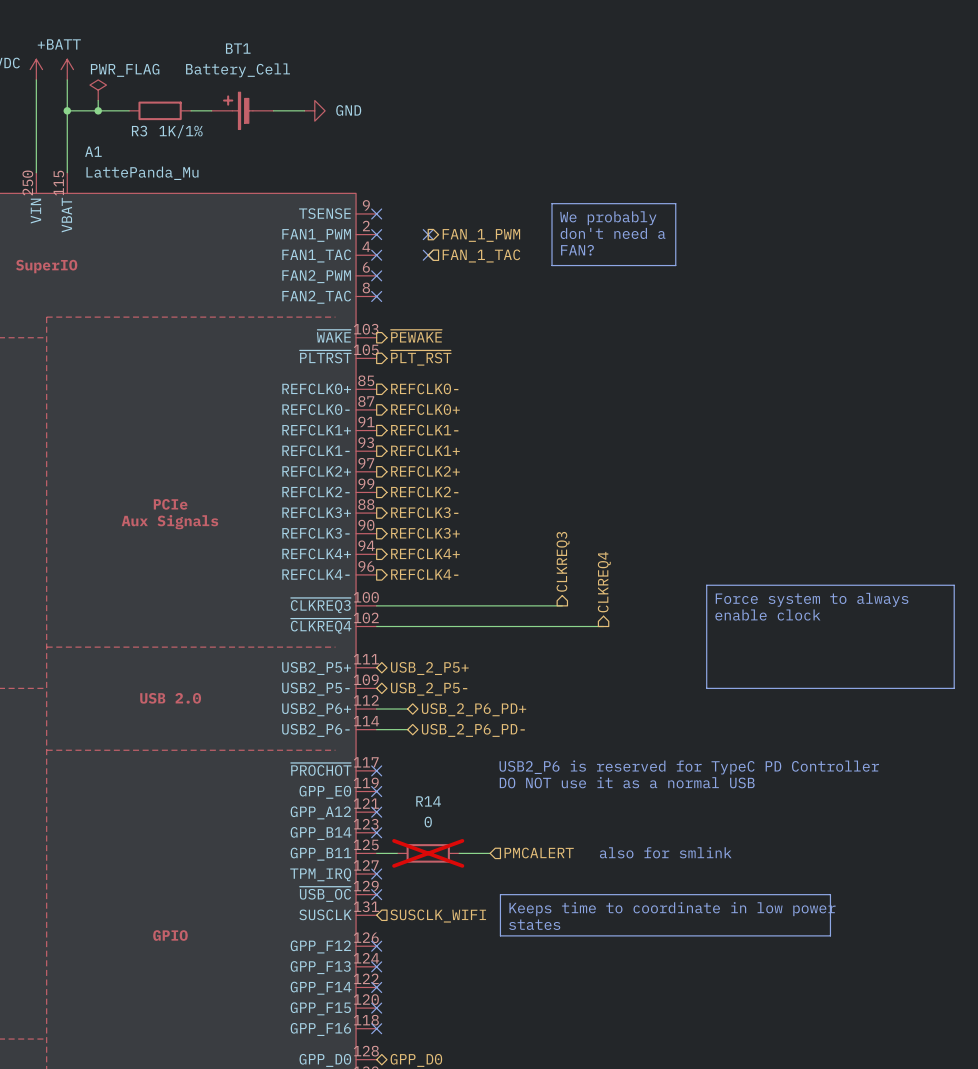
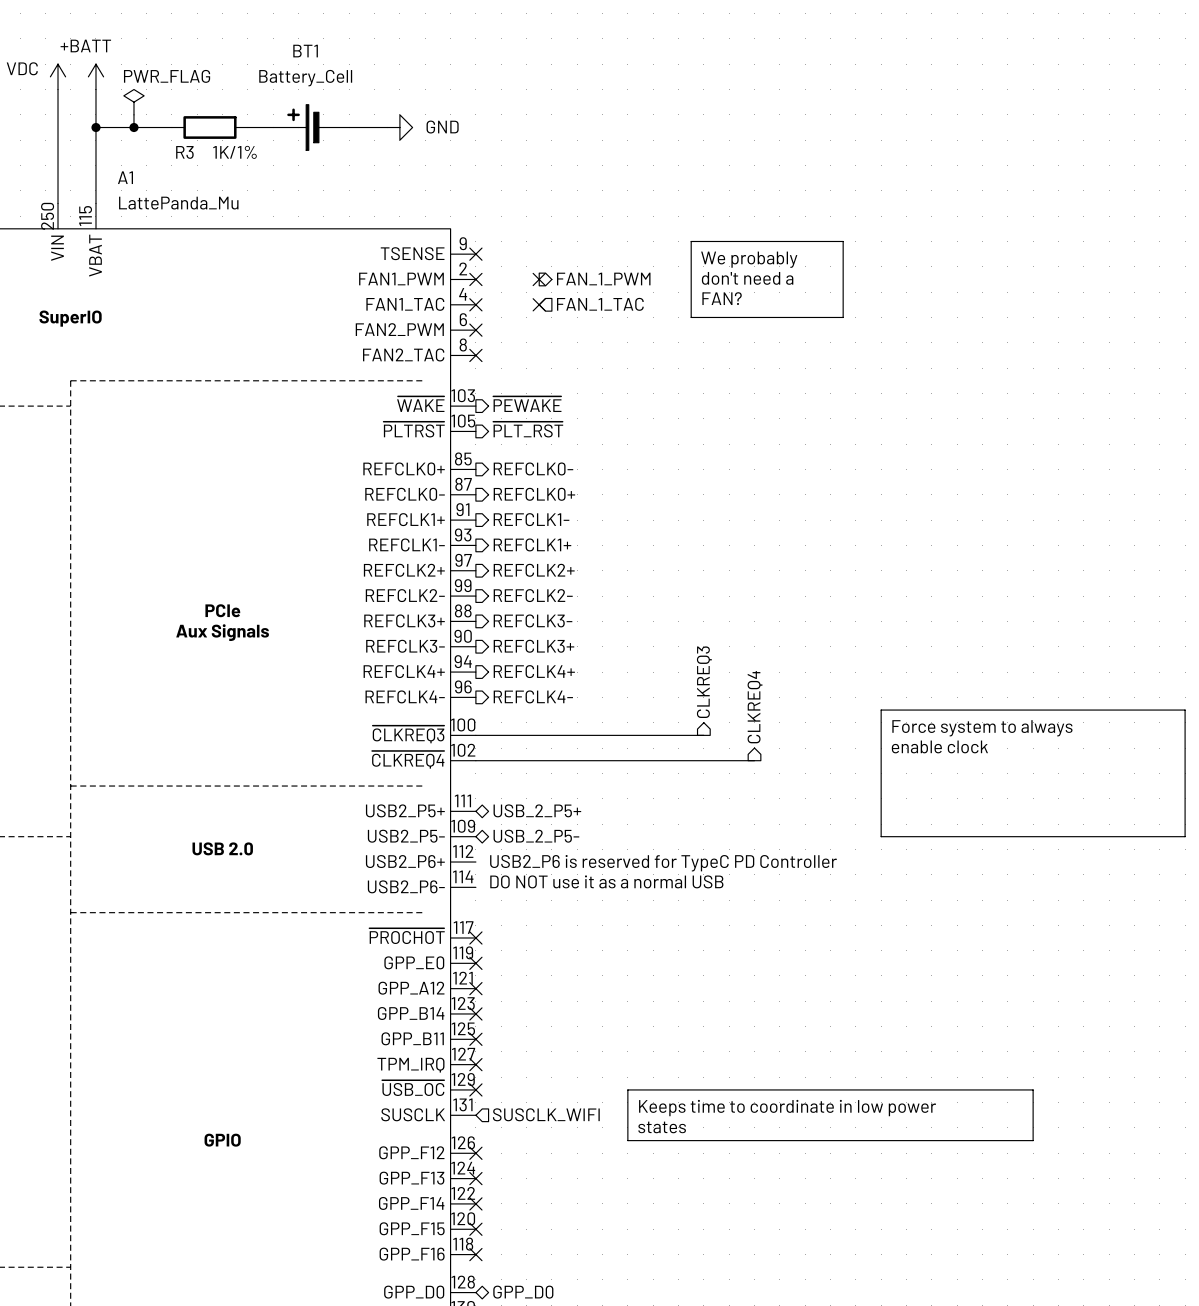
wire: (376, 709) (407, 709) -> none
hierarchical label: USB_2_P6_PD+ (474, 709) -> none
wire: (376, 729) (407, 729) -> none
hierarchical label: USB_2_P6_PD- (473, 730) -> none
text position: USB2_P6 is reserved for TypeC PD Controller (689, 767) -> USB2_P6 is reserved for TypeC PD Controller (663, 863)
text position: DO NOT use it as a normal USB (627, 782) -> DO NOT use it as a normal USB (606, 881)
text: also for smlink (665, 852) -> none
wire: (376, 853) (397, 853) -> none
no-connect mark: none -> (475, 1039)
R14: 0 (428, 853) -> none
wire: (459, 853) (490, 853) -> none
hierarchical label: PMCALERT (539, 853) -> none

